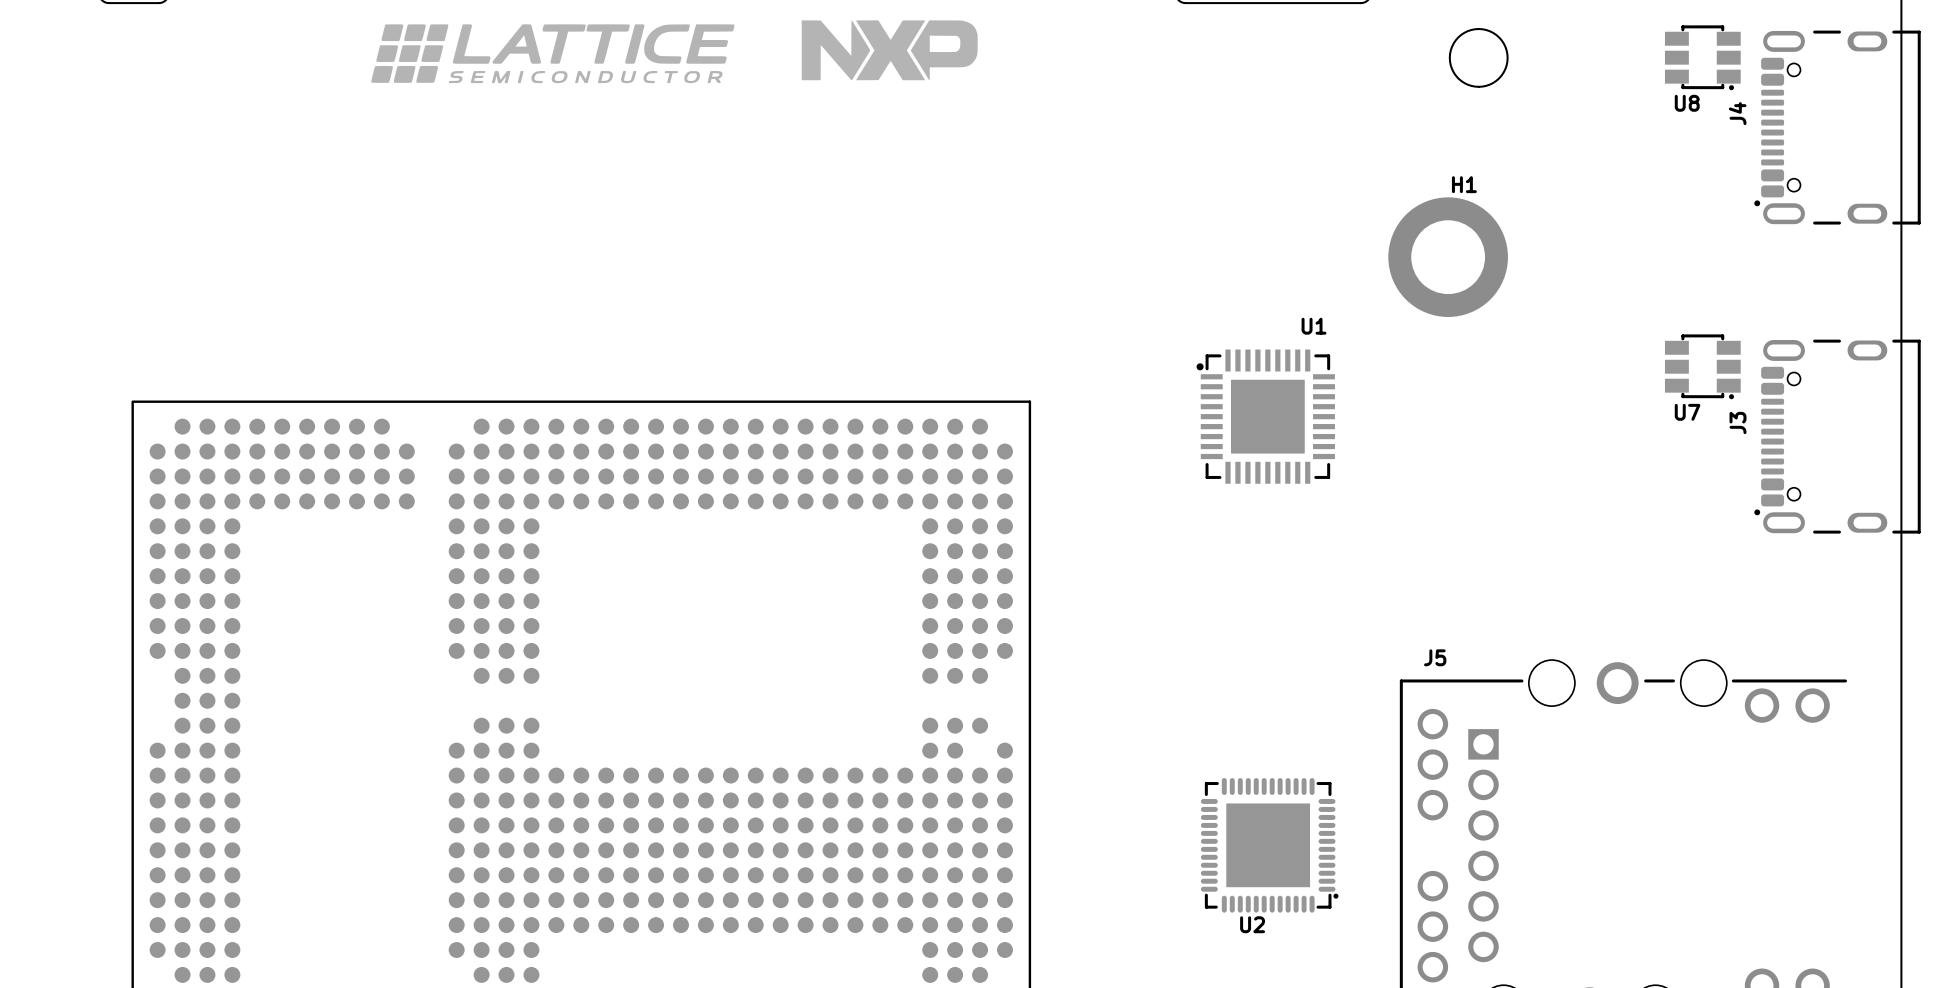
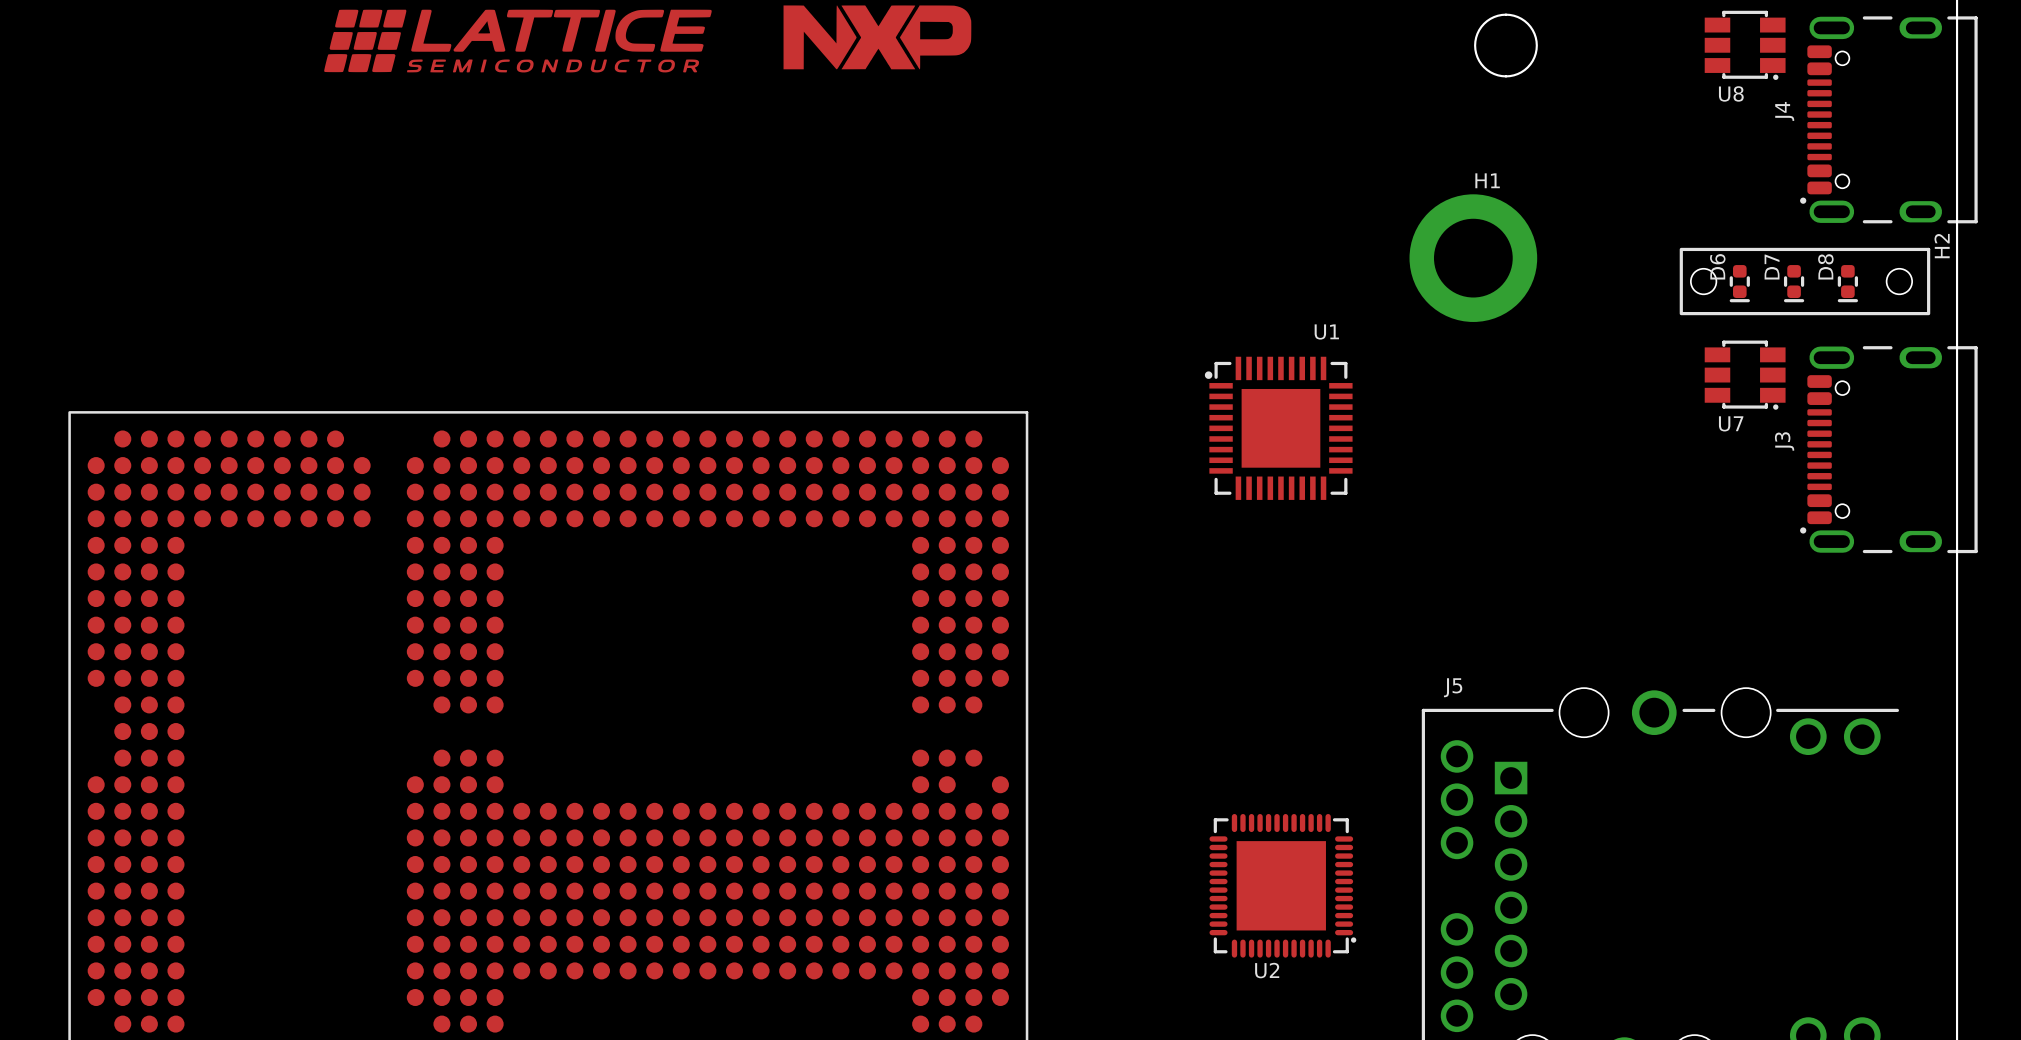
H2: none -> (1804, 281)
D6: none -> (1739, 283)
D7: none -> (1794, 283)
D8: none -> (1847, 283)

